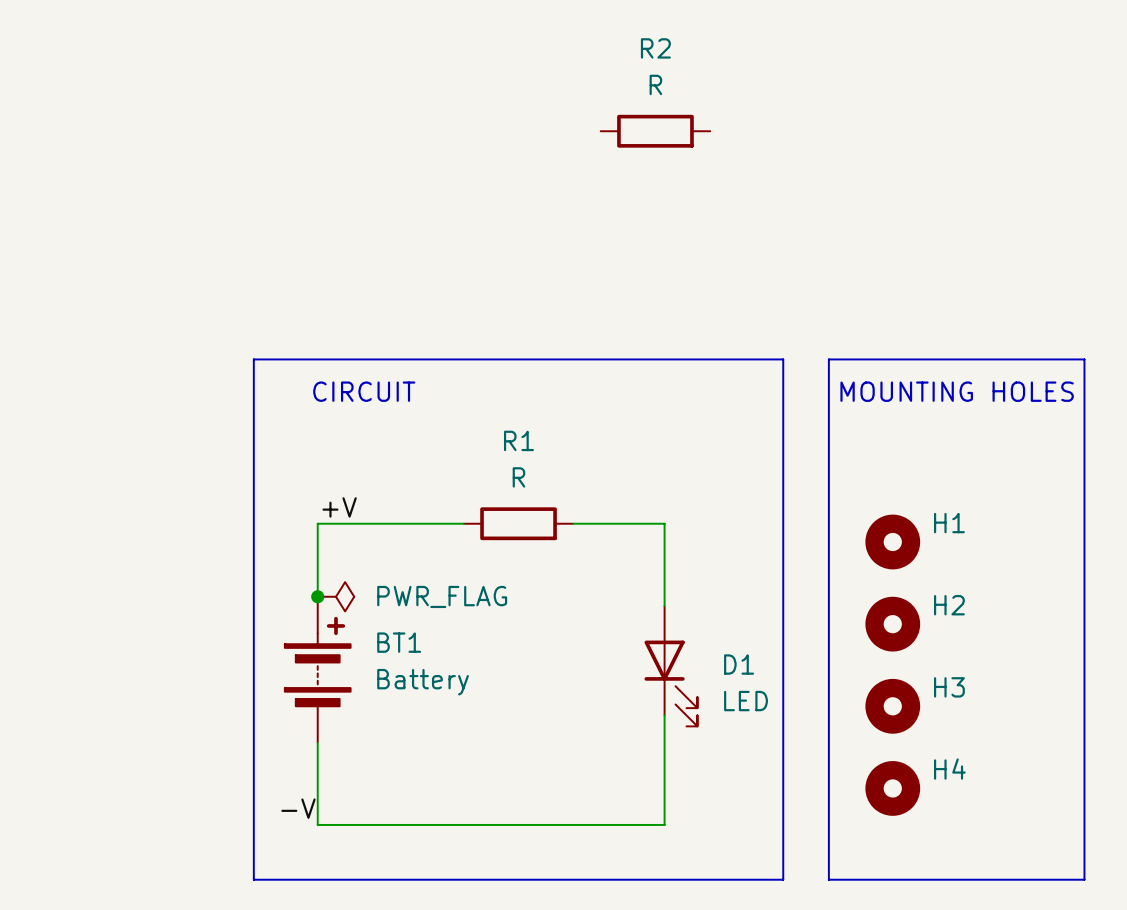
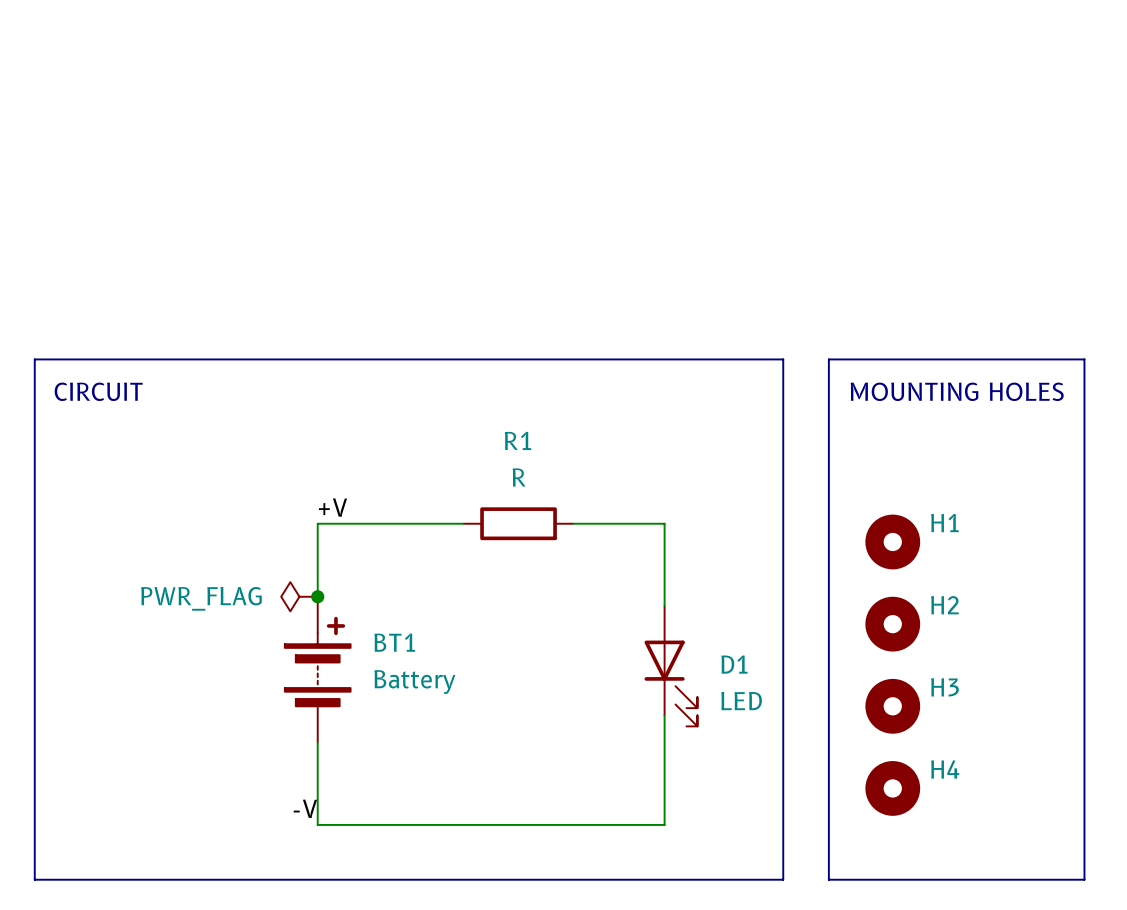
R2: R (655, 131) -> none
line: (253, 359) (253, 879) -> (253, 359) (34, 359) (34, 879) (253, 879)
text position: CIRCUIT (364, 391) -> CIRCUIT (98, 391)
power symbol rotation: 0° (335, 596) -> 180° (299, 596)
power symbol position: PWR_FLAG (335, 596) -> PWR_FLAG (299, 596)

